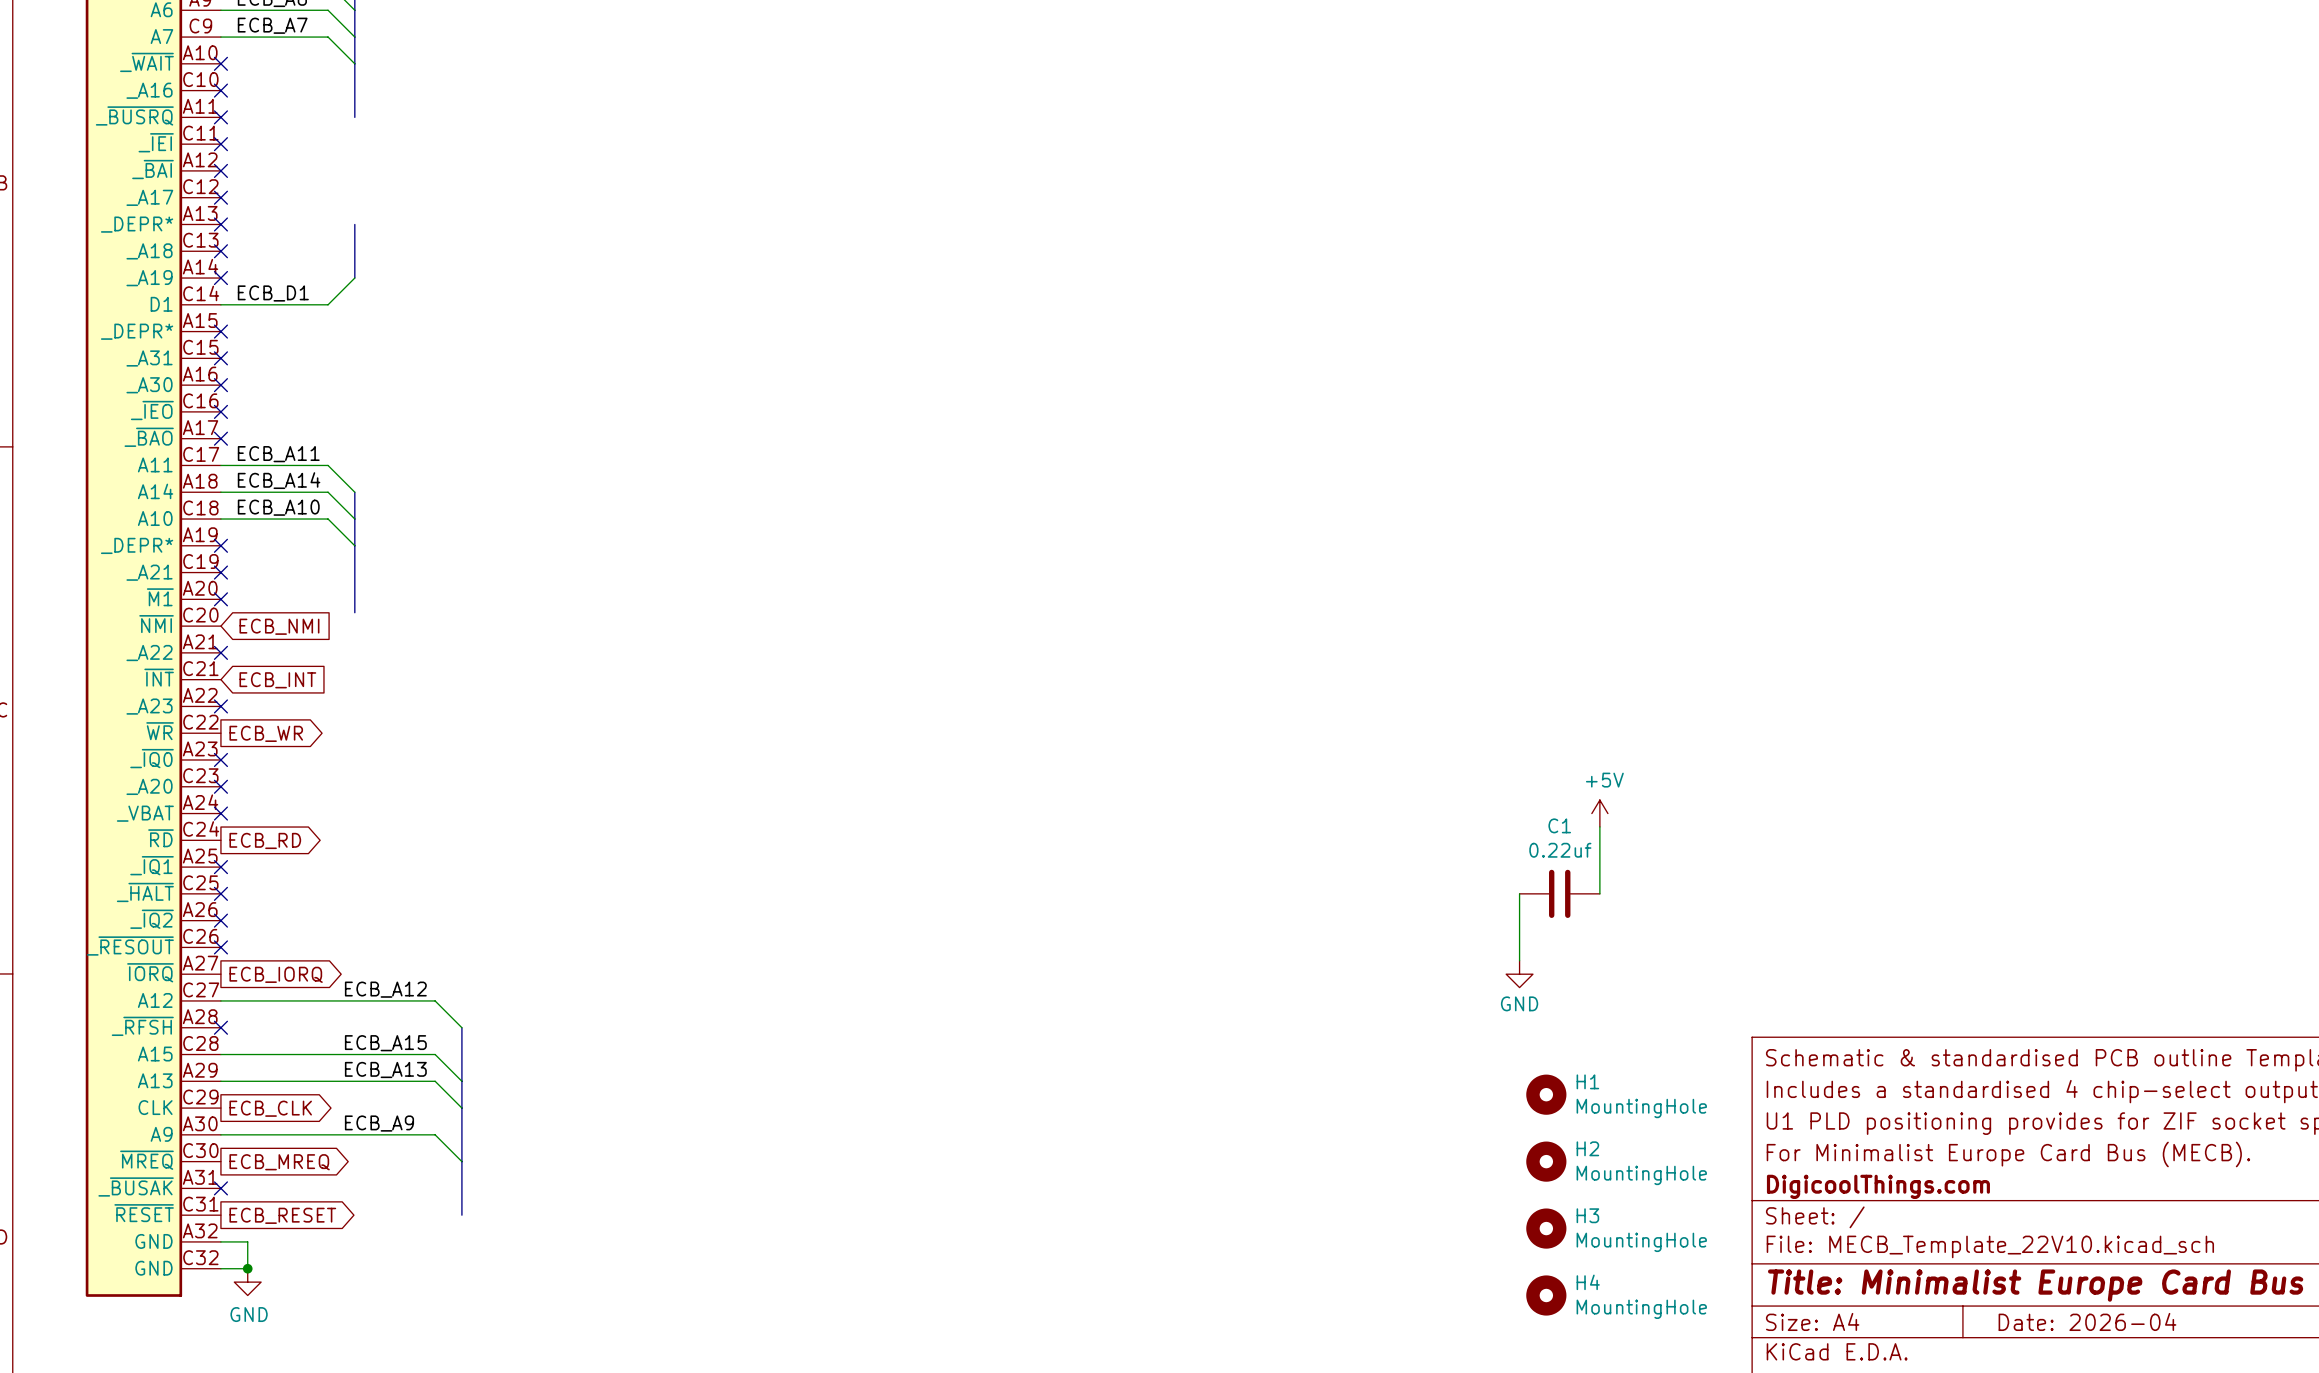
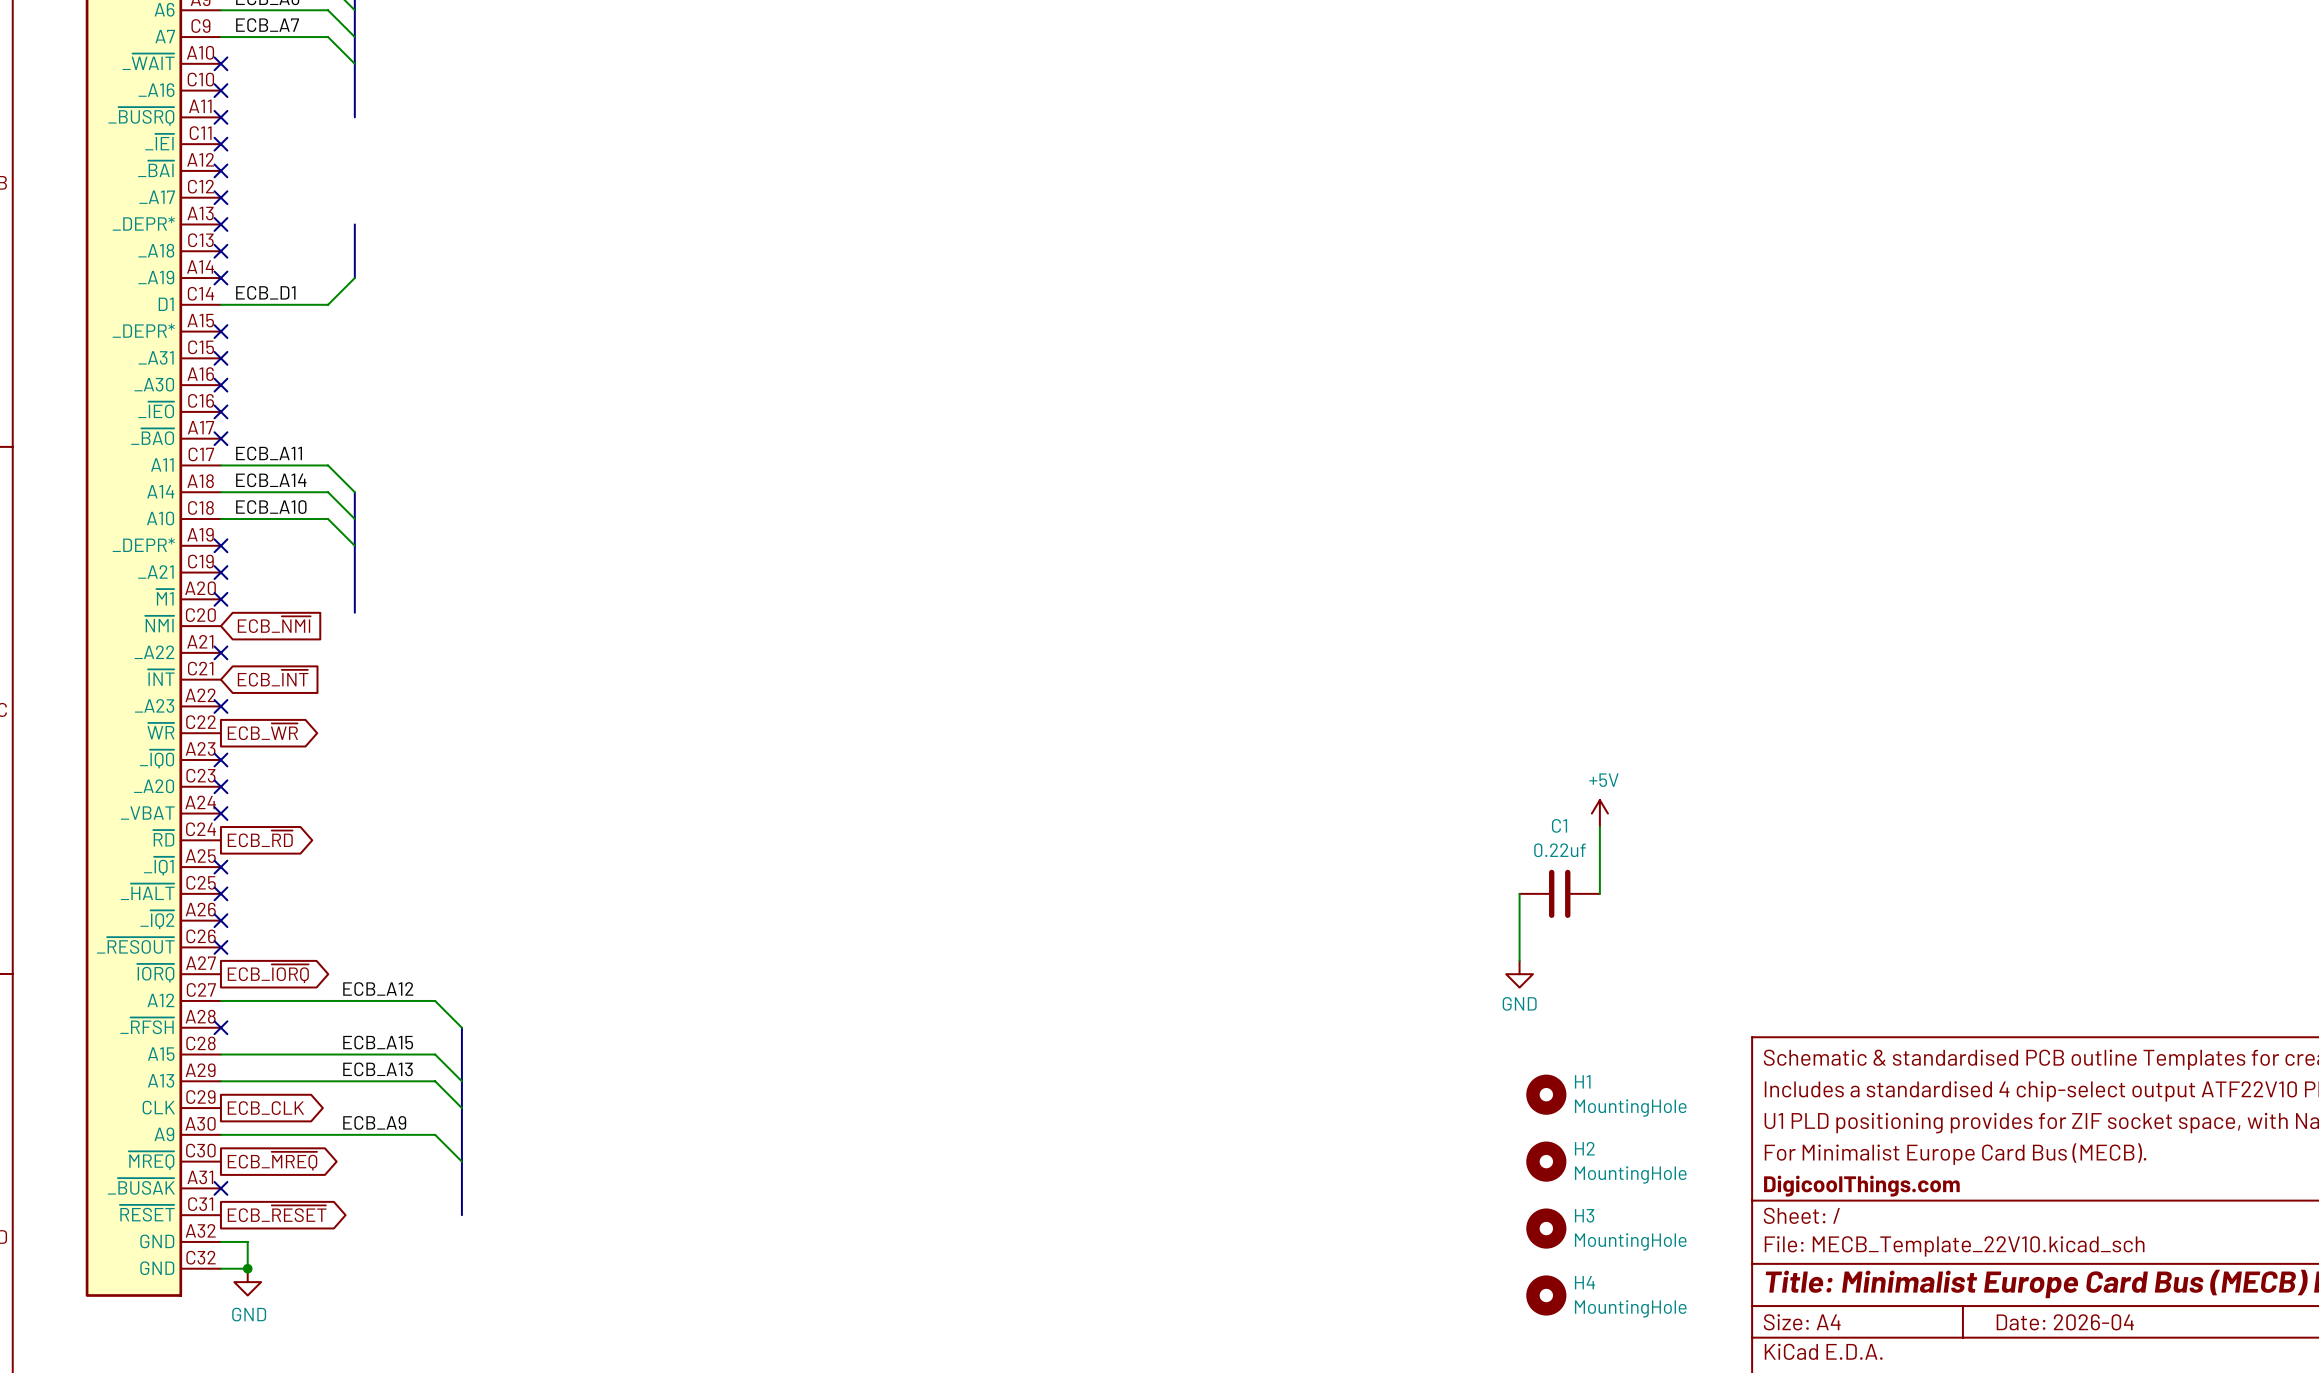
global label: ECB_NMI (279, 626) -> ECB_~{NMI} (274, 624)
global label: ECB_INT (277, 680) -> ECB_~{INT} (273, 678)
global label: ECB_WR (266, 733) -> ECB_~{WR} (262, 731)
global label: ECB_RD (265, 840) -> ECB_~{RD} (260, 838)
global label: ECB_IORQ (276, 974) -> ECB_~{IORQ} (268, 973)
global label: ECB_MREQ (279, 1162) -> ECB_~{MREQ} (272, 1161)
global label: ECB_RESET (282, 1215) -> ECB_~{RESET} (277, 1213)

